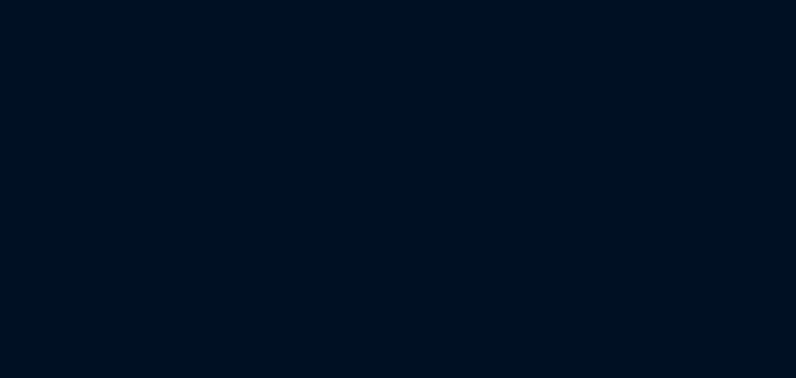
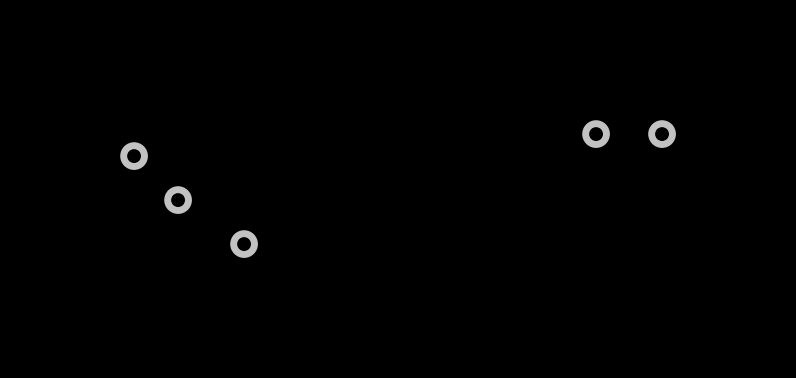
via: none -> (596, 134)
via: none -> (662, 134)
via: none -> (134, 156)
via: none -> (178, 200)
via: none -> (244, 244)

